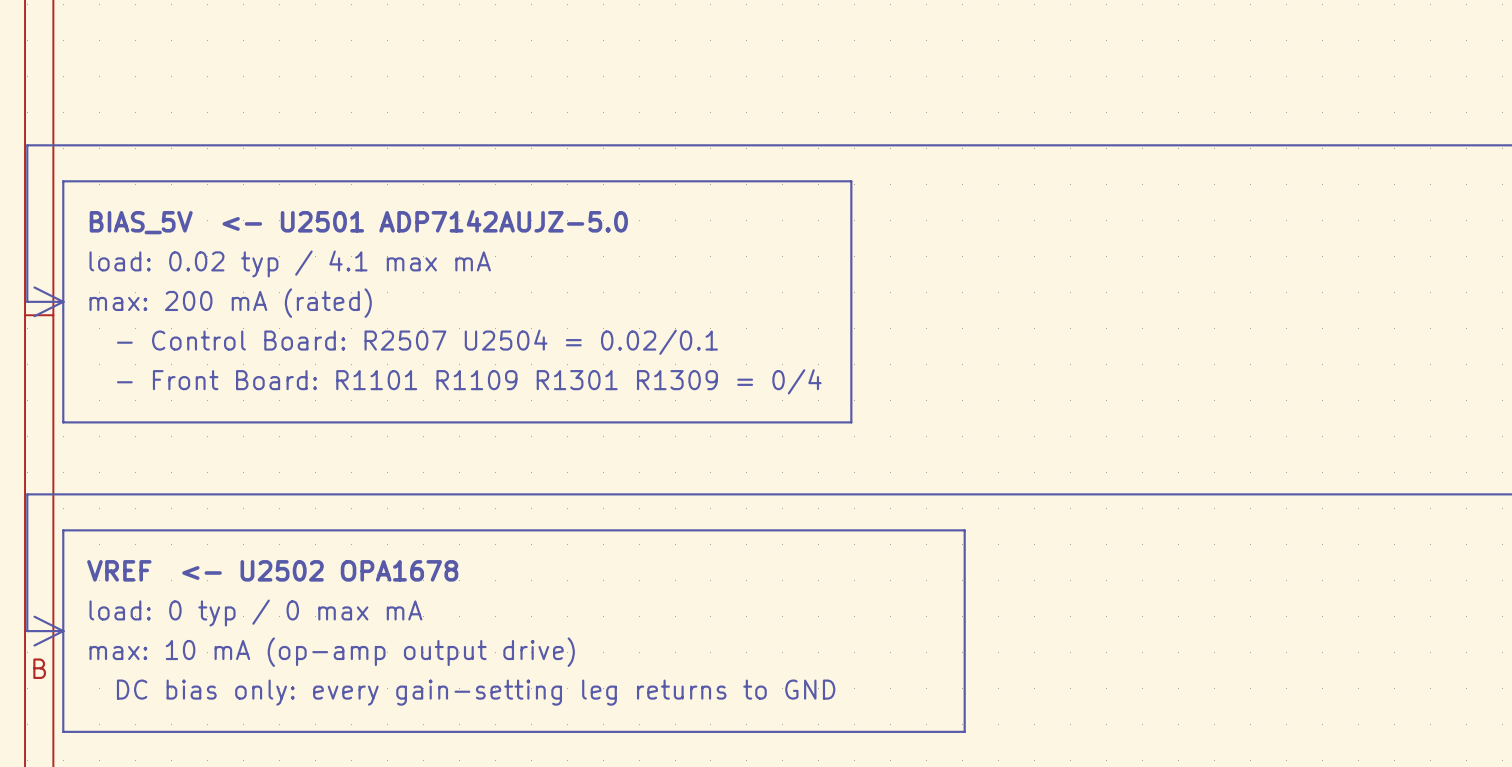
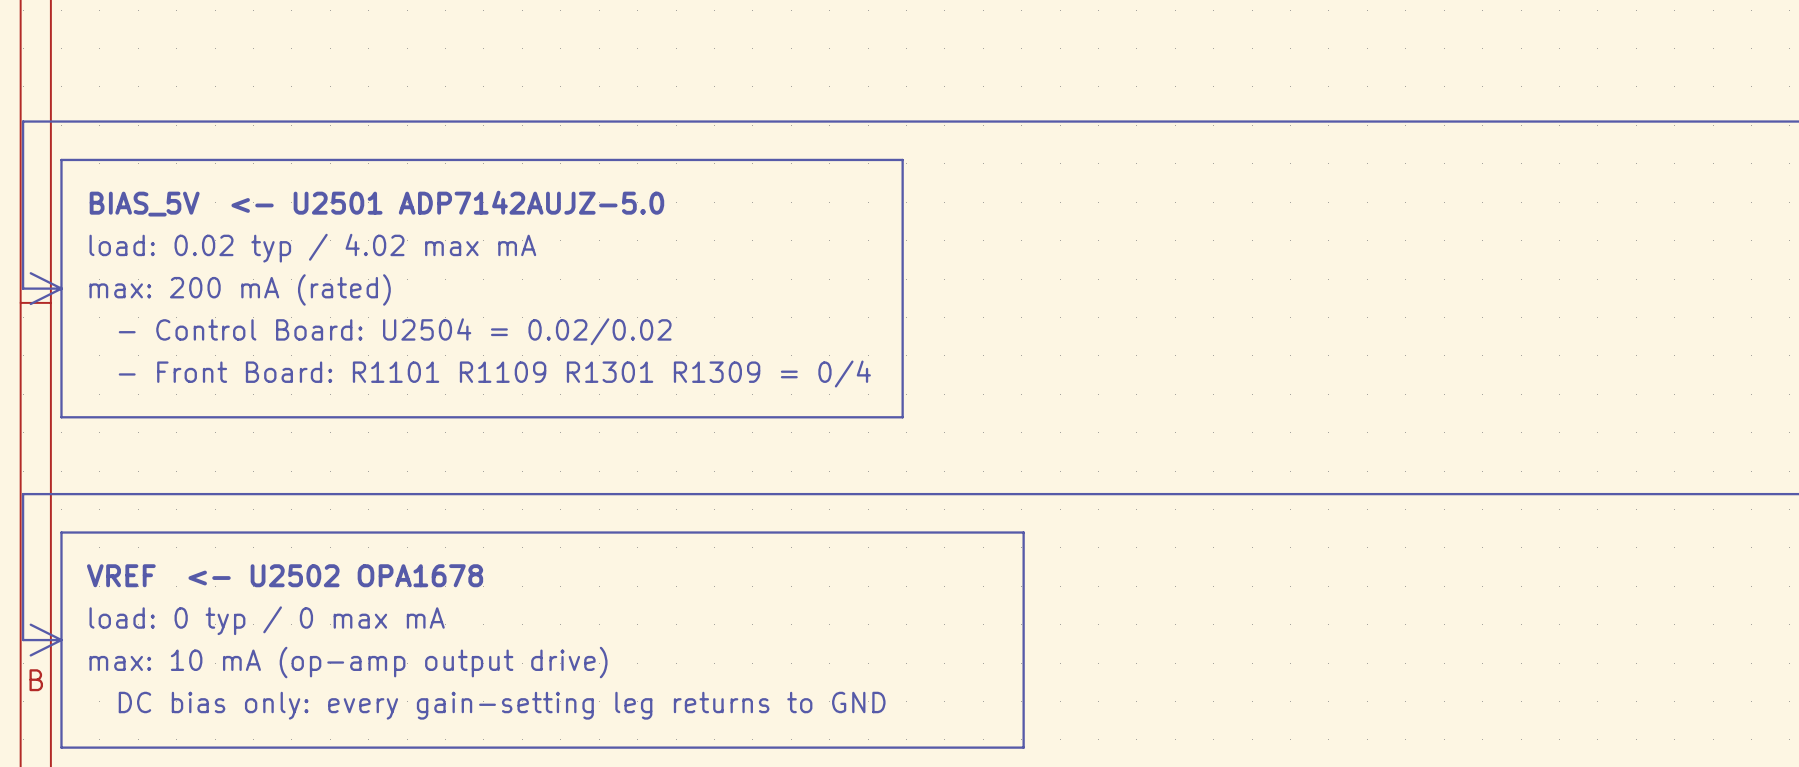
text: load: 0.02 typ / 4.1 max mA (290, 263) -> load: 0.02 typ / 4.02 max mA (312, 248)
text: - Control Board: R2507 U2504 = 0.02/0.1 (417, 342) -> - Control Board: U2504 = 0.02/0.02 (395, 331)

